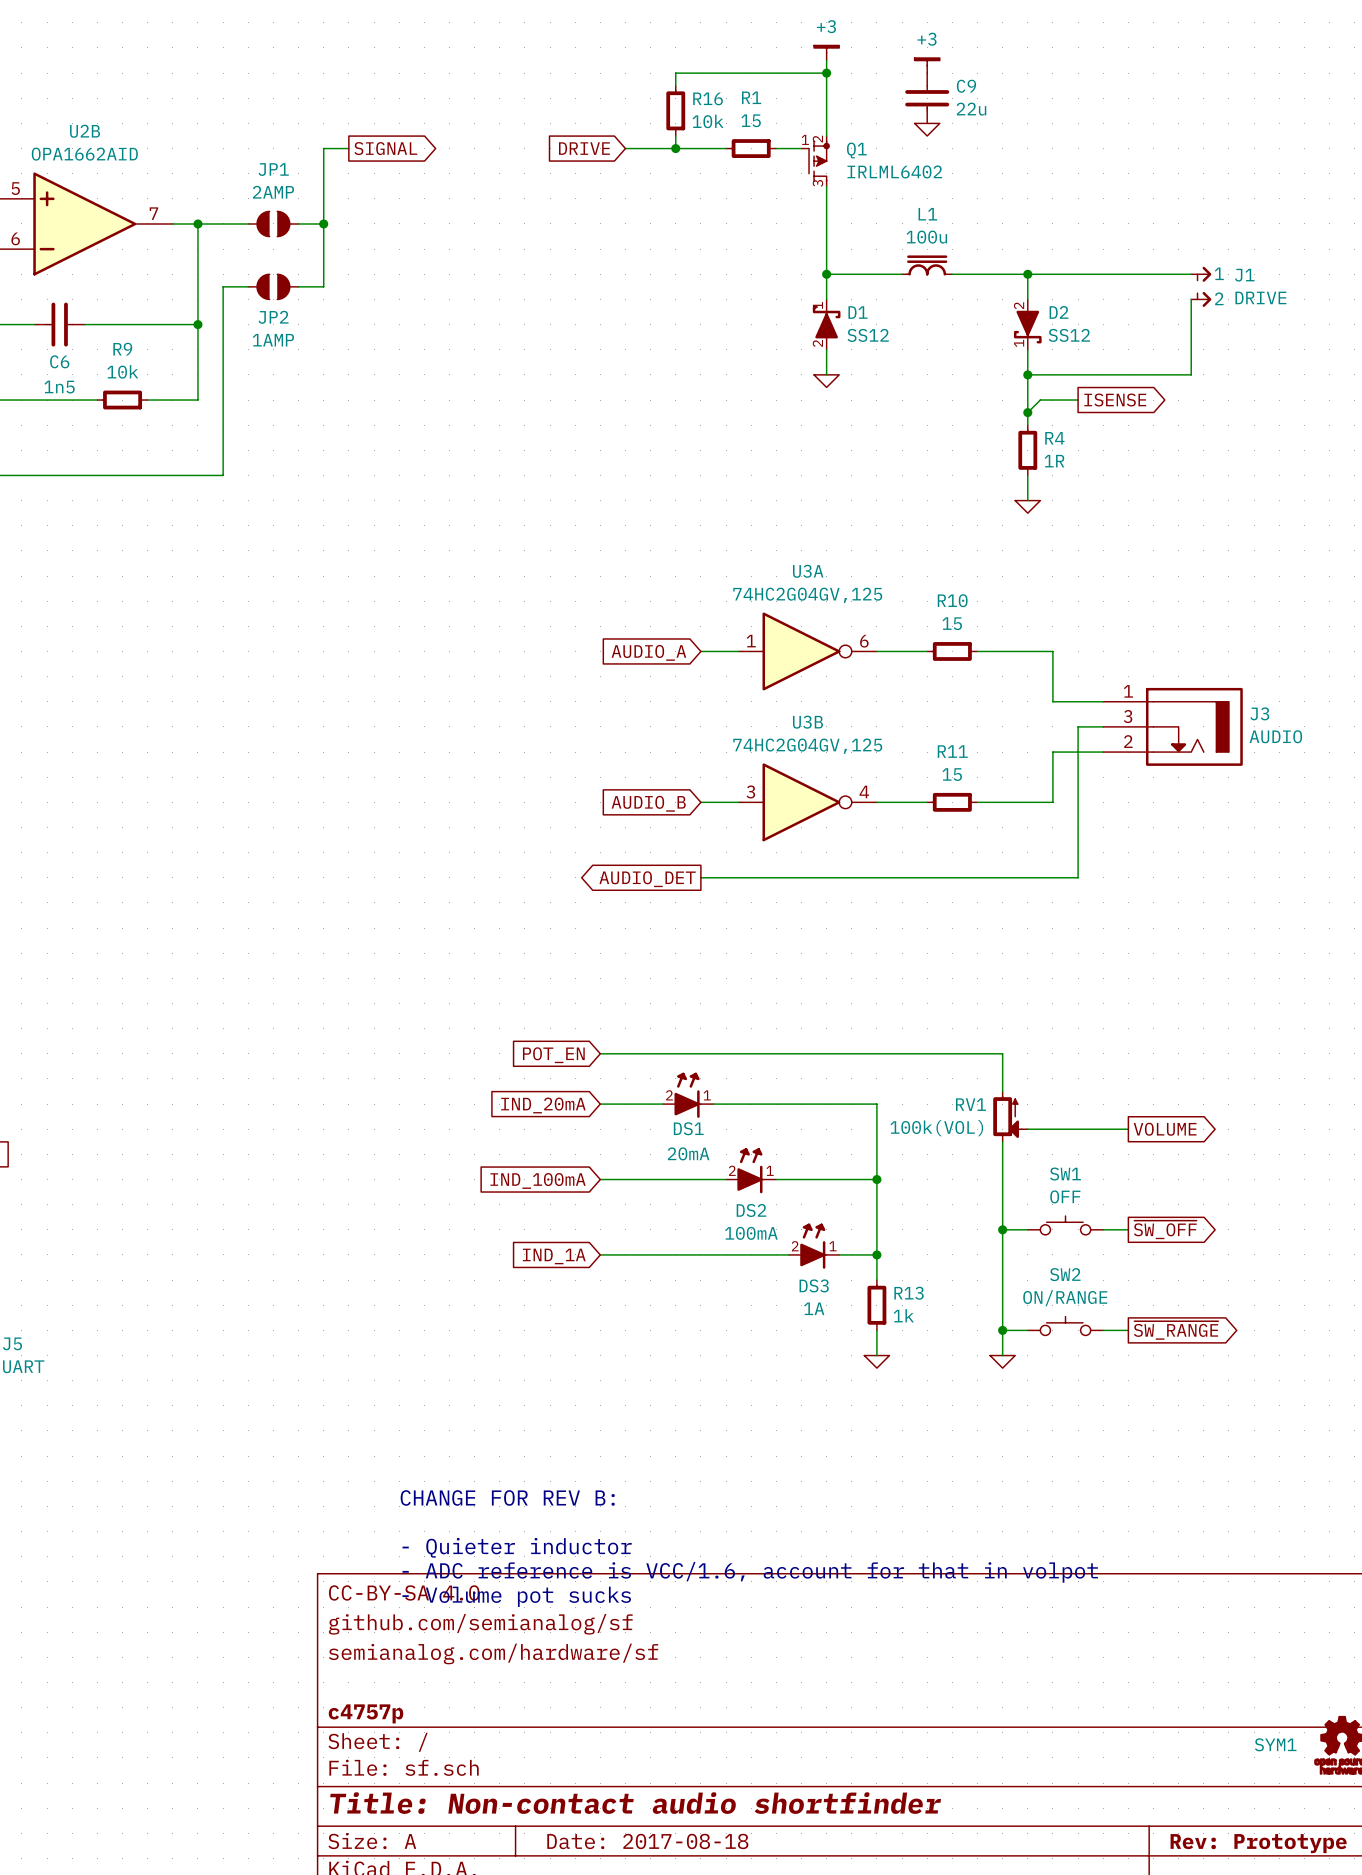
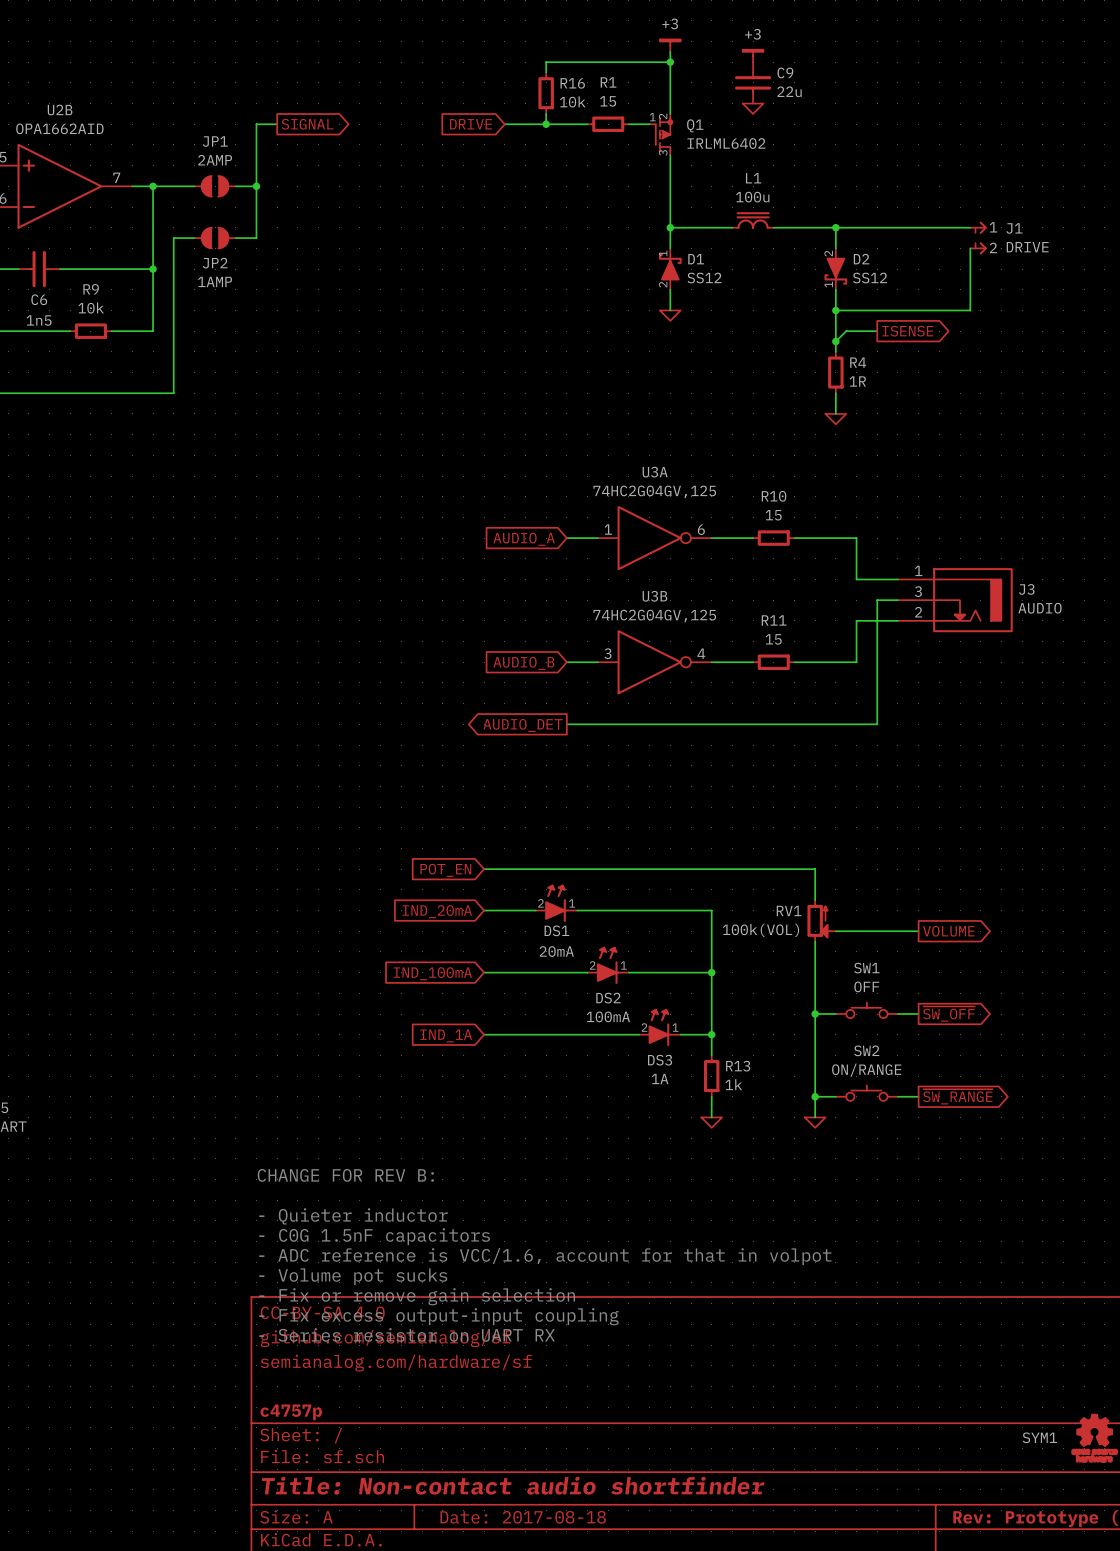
text position: CHANGE FOR REV B: (507, 1497) -> CHANGE FOR REV B: (345, 1175)
text: none -> - C0G 1.5nF capacitors (374, 1236)
text position: - Quieter inductor (517, 1547) -> - Quieter inductor (353, 1216)
text position: - ADC reference is VCC/1.6, account for that in volpot (750, 1572) -> - ADC reference is VCC/1.6, account for that in volpot (545, 1256)
text: none -> - Fix or remove gain selection (417, 1296)
text position: - Volume pot sucks (516, 1596) -> - Volume pot sucks (353, 1276)
text: none -> - Fix excess output-input coupling (438, 1316)
text: none -> - Series resistor on UART RX (407, 1334)

